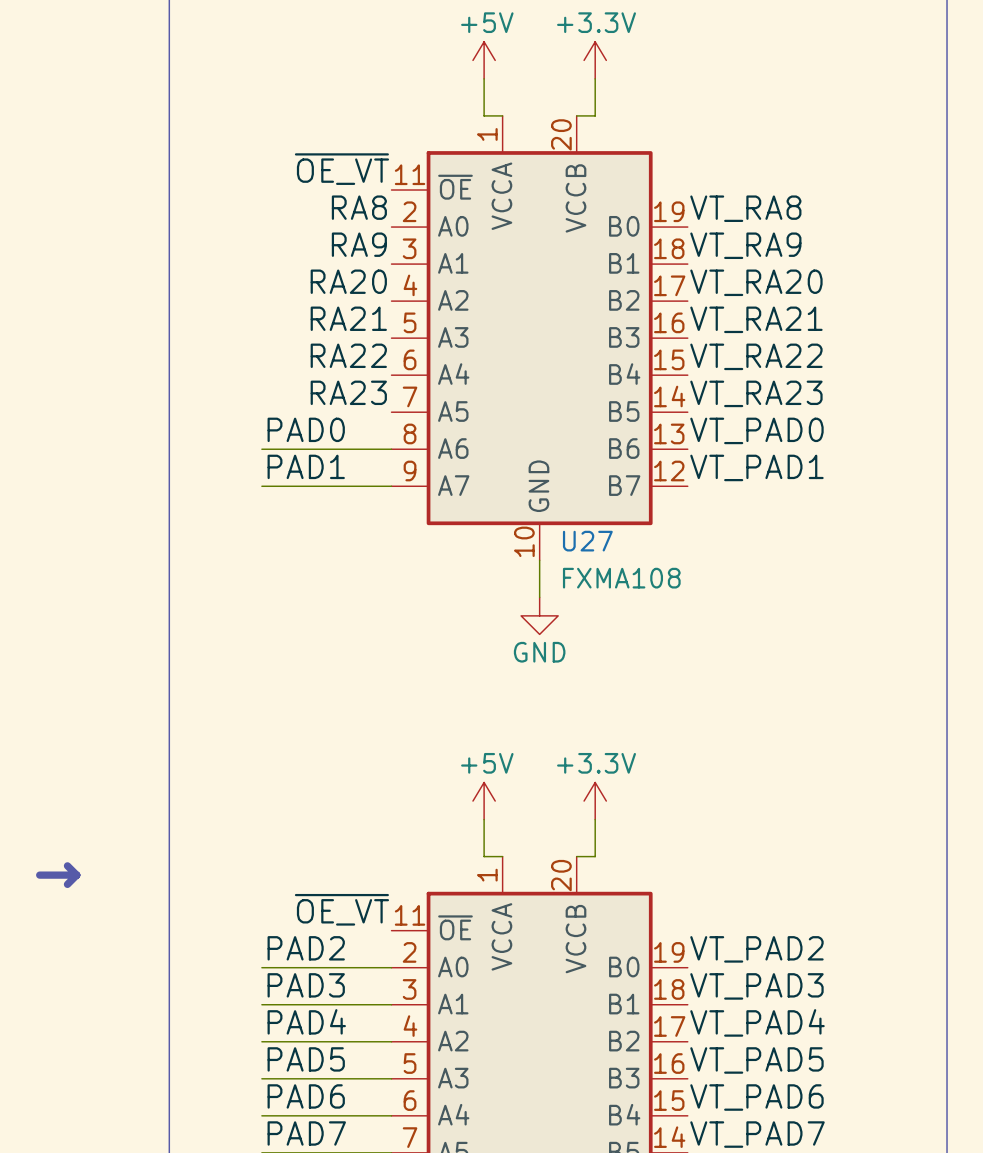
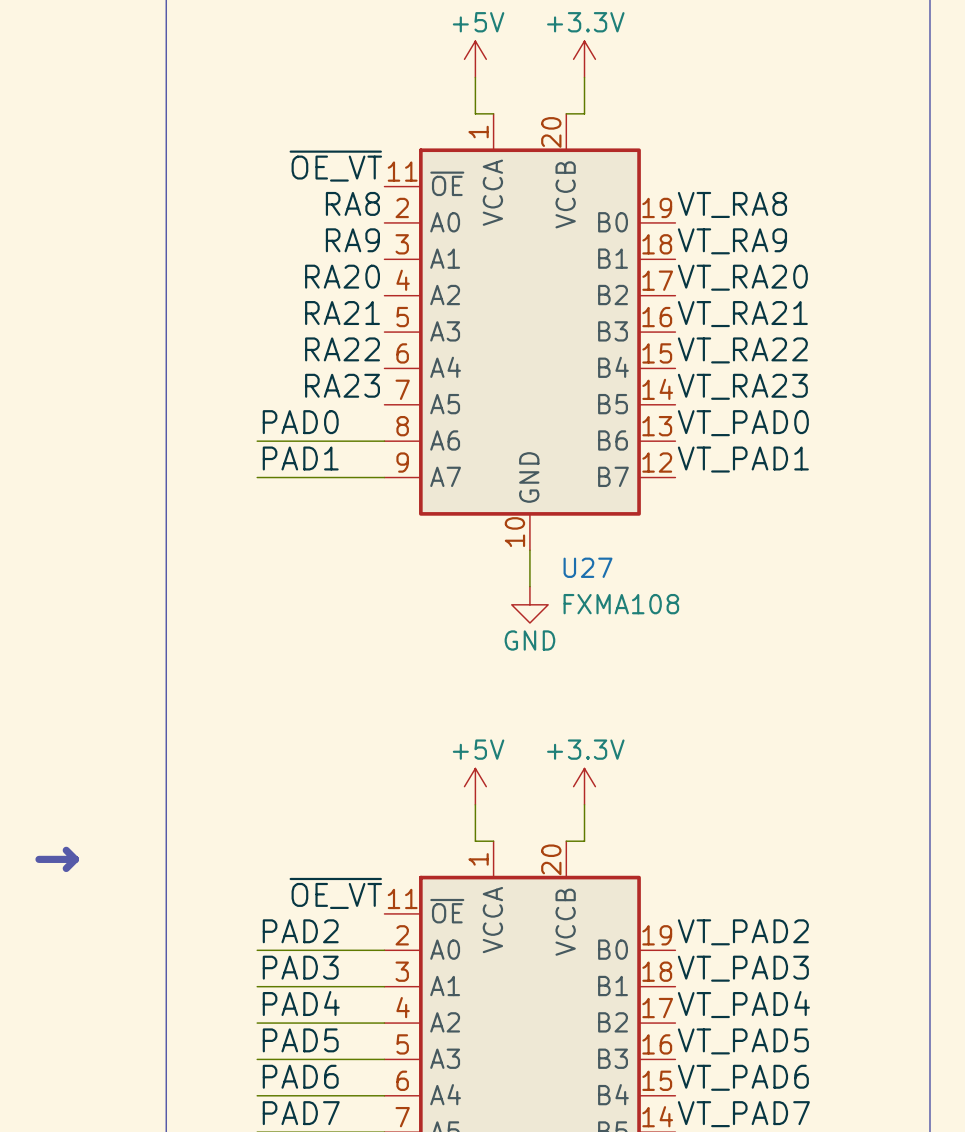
U27 name position: U27 (587, 541) -> U27 (588, 567)
U27 value position: FXMA108 (621, 578) -> FXMA108 (621, 604)

